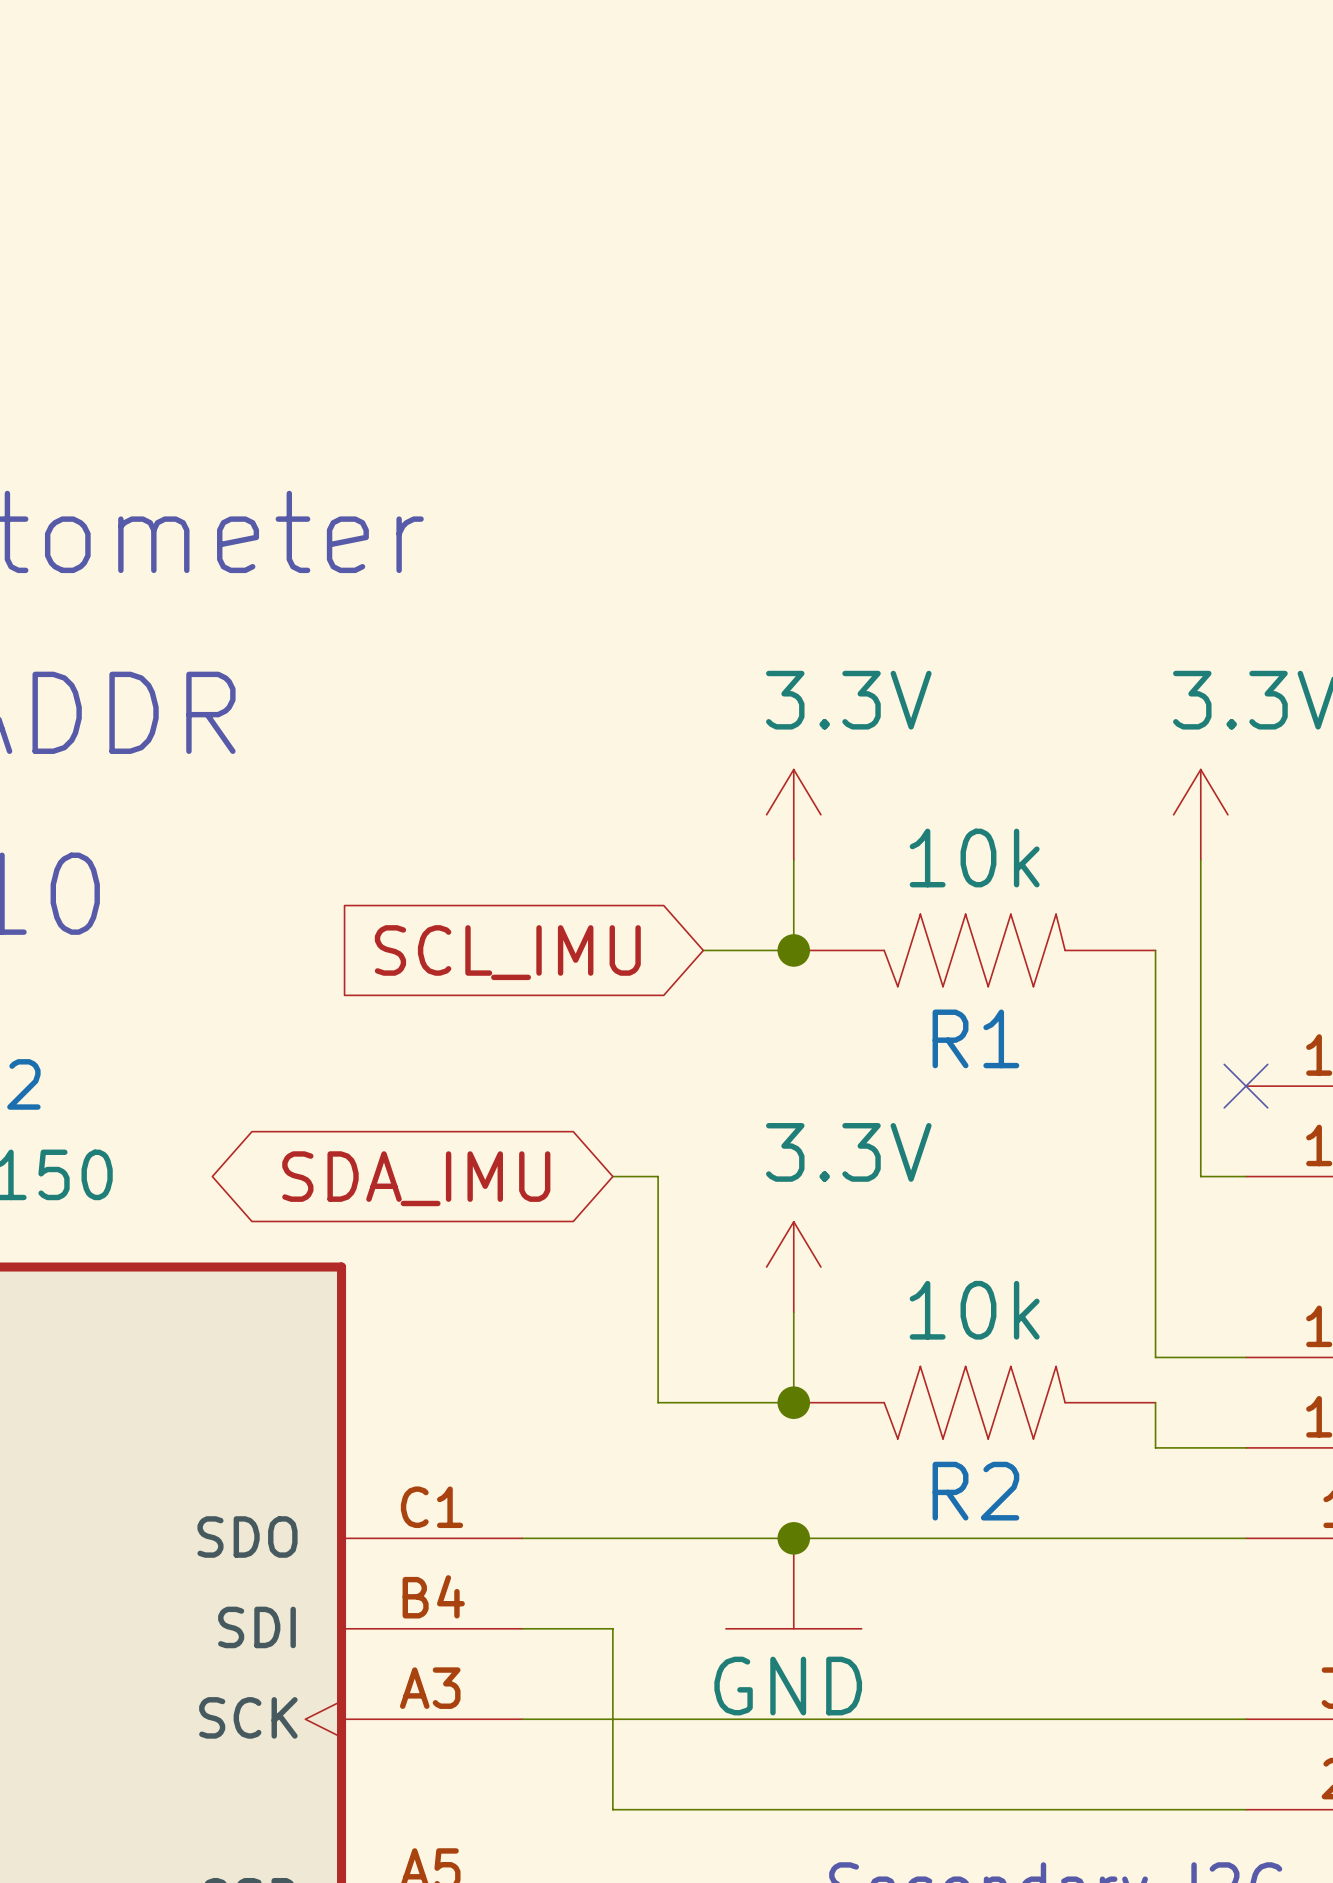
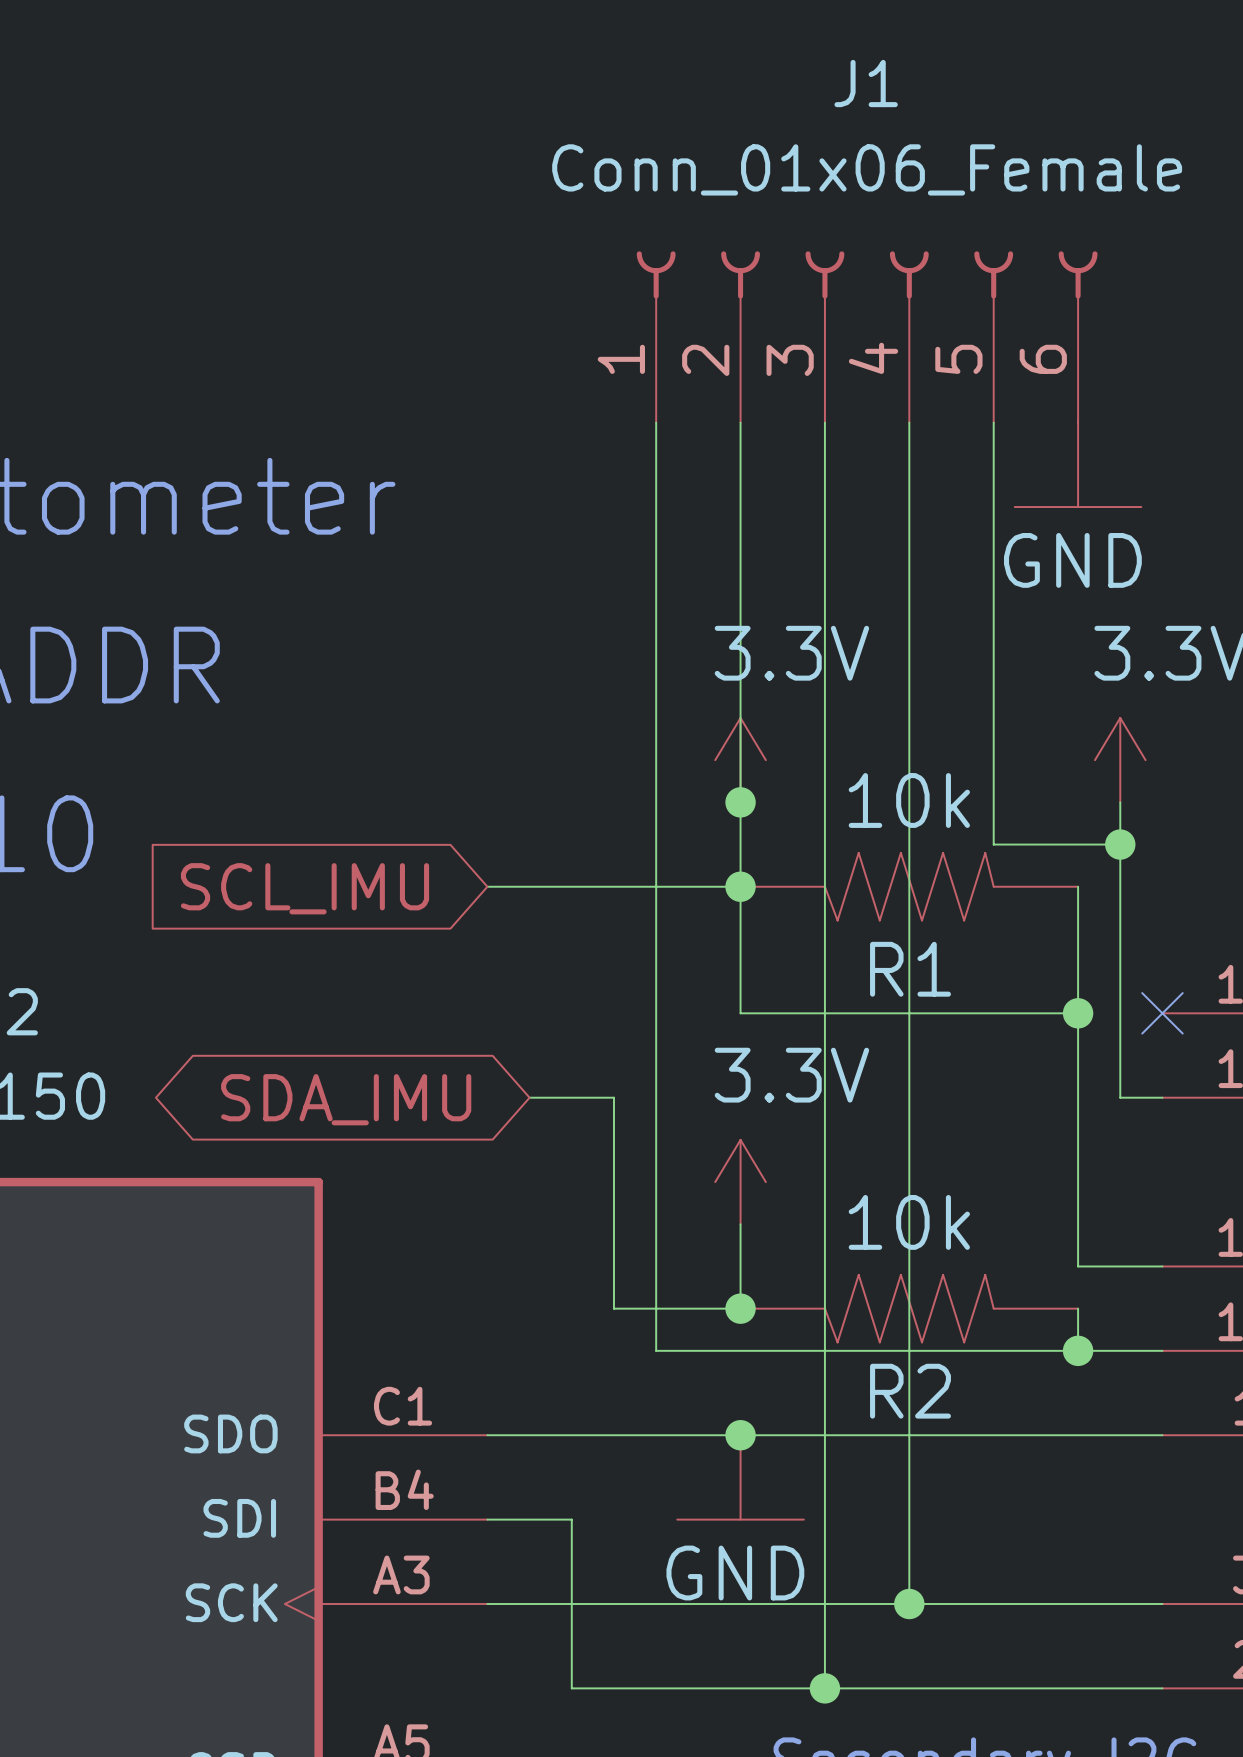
J1: none -> Conn_01x06_Female (867, 336)
wire: none -> (656, 422) (656, 1350) (1078, 1350)
wire: none -> (740, 422) (740, 802)
wire: none -> (824, 422) (824, 1688)
wire: none -> (909, 422) (909, 1604)
wire: none -> (993, 422) (993, 844) (1120, 844)
power symbol: none -> GND (1078, 464)
junction: none -> (740, 802)
junction: none -> (1120, 844)
wire: none -> (487, 886) (656, 886)
wire: none -> (740, 886) (740, 1013) (1078, 1013)
global label position: SCL_IMU (507, 952) -> SCL_IMU (305, 888)
junction: none -> (1078, 1013)
wire: none -> (529, 1097) (571, 1097)
global label position: SDA_IMU (416, 1178) -> SDA_IMU (346, 1099)
junction: none -> (1078, 1350)
junction: none -> (909, 1604)
junction: none -> (824, 1688)

